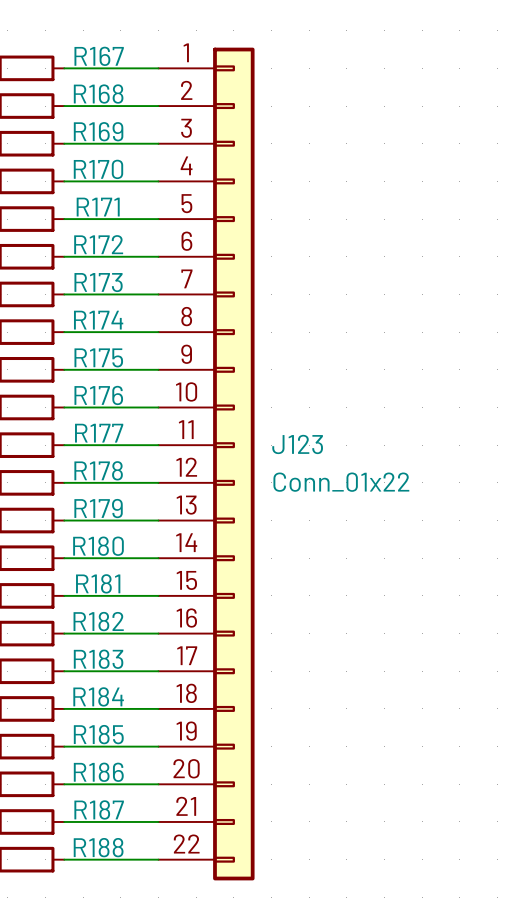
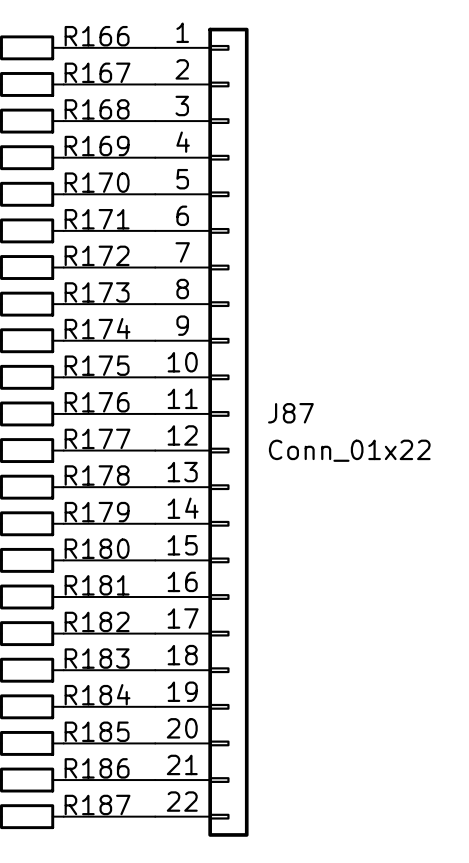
R167 name: R167 (99, 56) -> R166 (97, 36)
R168 name: R168 (98, 94) -> R167 (97, 72)
R169 name: R169 (98, 131) -> R168 (97, 109)
R170 name: R170 (98, 169) -> R169 (97, 146)
R171 name: R171 (98, 207) -> R170 (97, 182)
R172 name: R172 (98, 244) -> R171 (97, 219)
R173 name: R173 (98, 282) -> R172 (97, 255)
R174 name: R174 (98, 320) -> R173 (97, 292)
R175 name: R175 (98, 357) -> R174 (97, 328)
R176 name: R176 (98, 395) -> R175 (97, 365)
R177 name: R177 (99, 433) -> R176 (97, 402)
J123 name: J123 (297, 444) -> J87 (290, 413)
R178 name: R178 (98, 470) -> R177 (97, 438)
R179 name: R179 (98, 508) -> R178 (97, 475)
R180 name: R180 (98, 546) -> R179 (97, 512)
R181 name: R181 (98, 583) -> R180 (97, 548)
R182 name: R182 (98, 621) -> R181 (97, 585)
R183 name: R183 (98, 659) -> R182 (97, 621)
R184 name: R184 (98, 696) -> R183 (97, 658)
R185 name: R185 (98, 734) -> R184 (97, 694)
R186 name: R186 (98, 772) -> R185 (97, 731)
R187 name: R187 (99, 809) -> R186 (97, 768)
R188 name: R188 (98, 847) -> R187 (97, 804)

